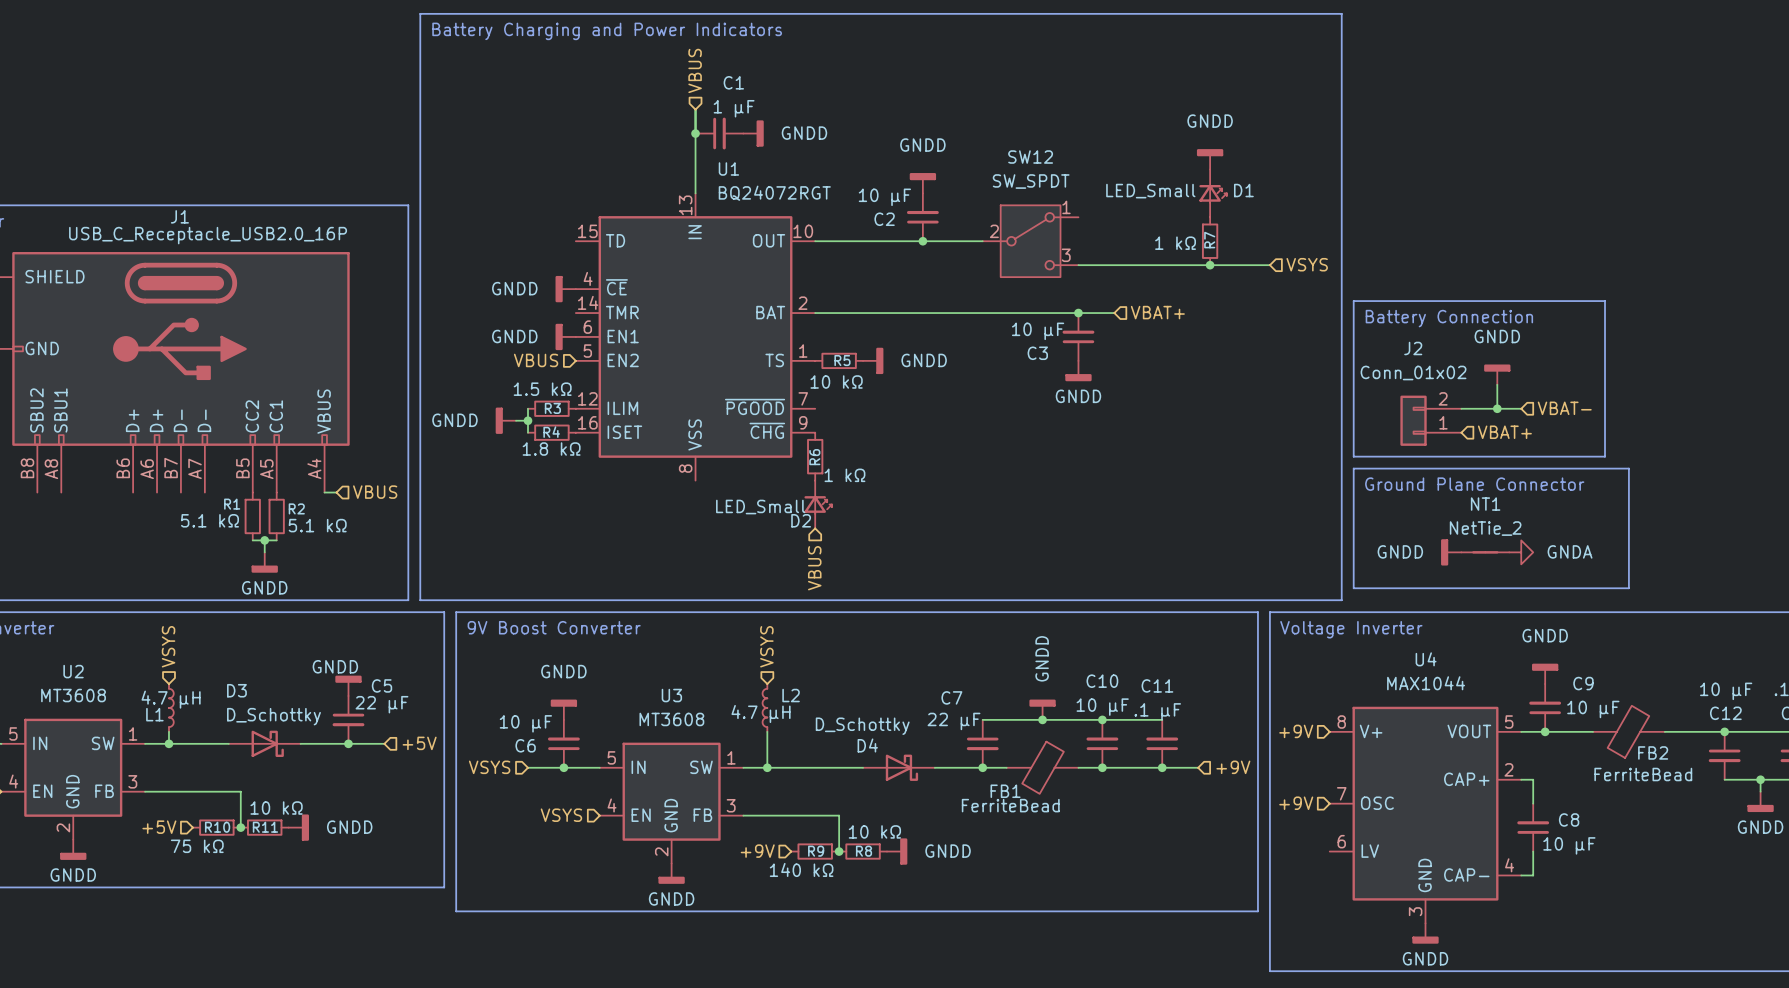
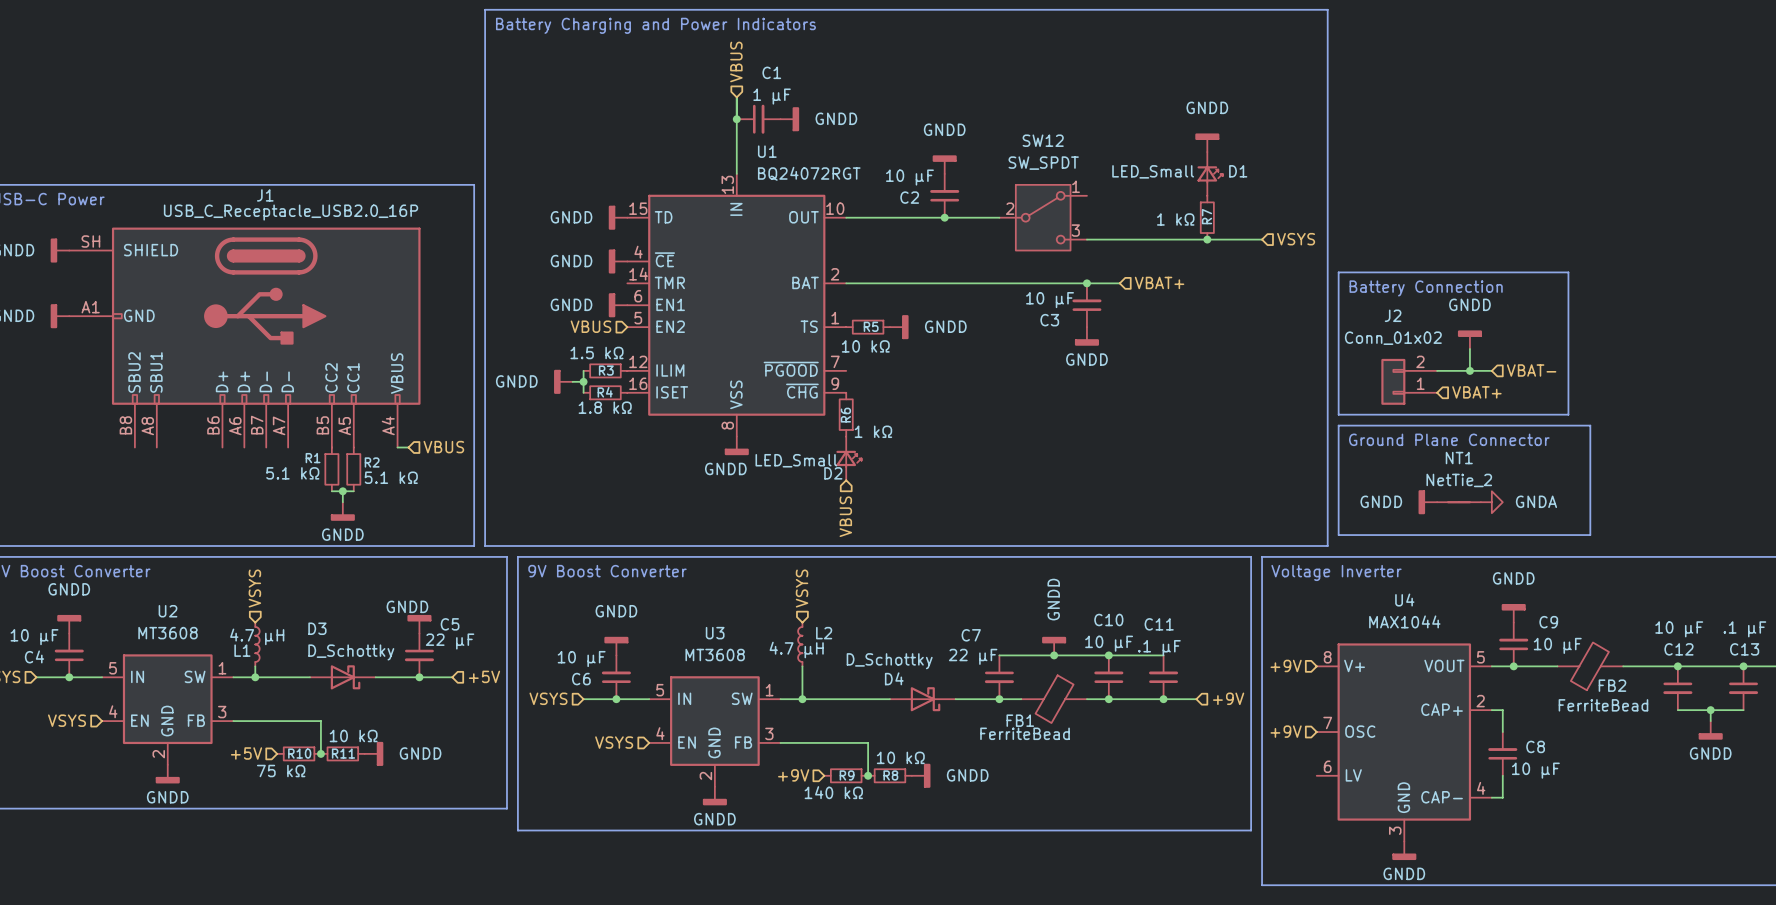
power symbol: none -> GNDD (618, 217)
power symbol: none -> GNDD (736, 445)

